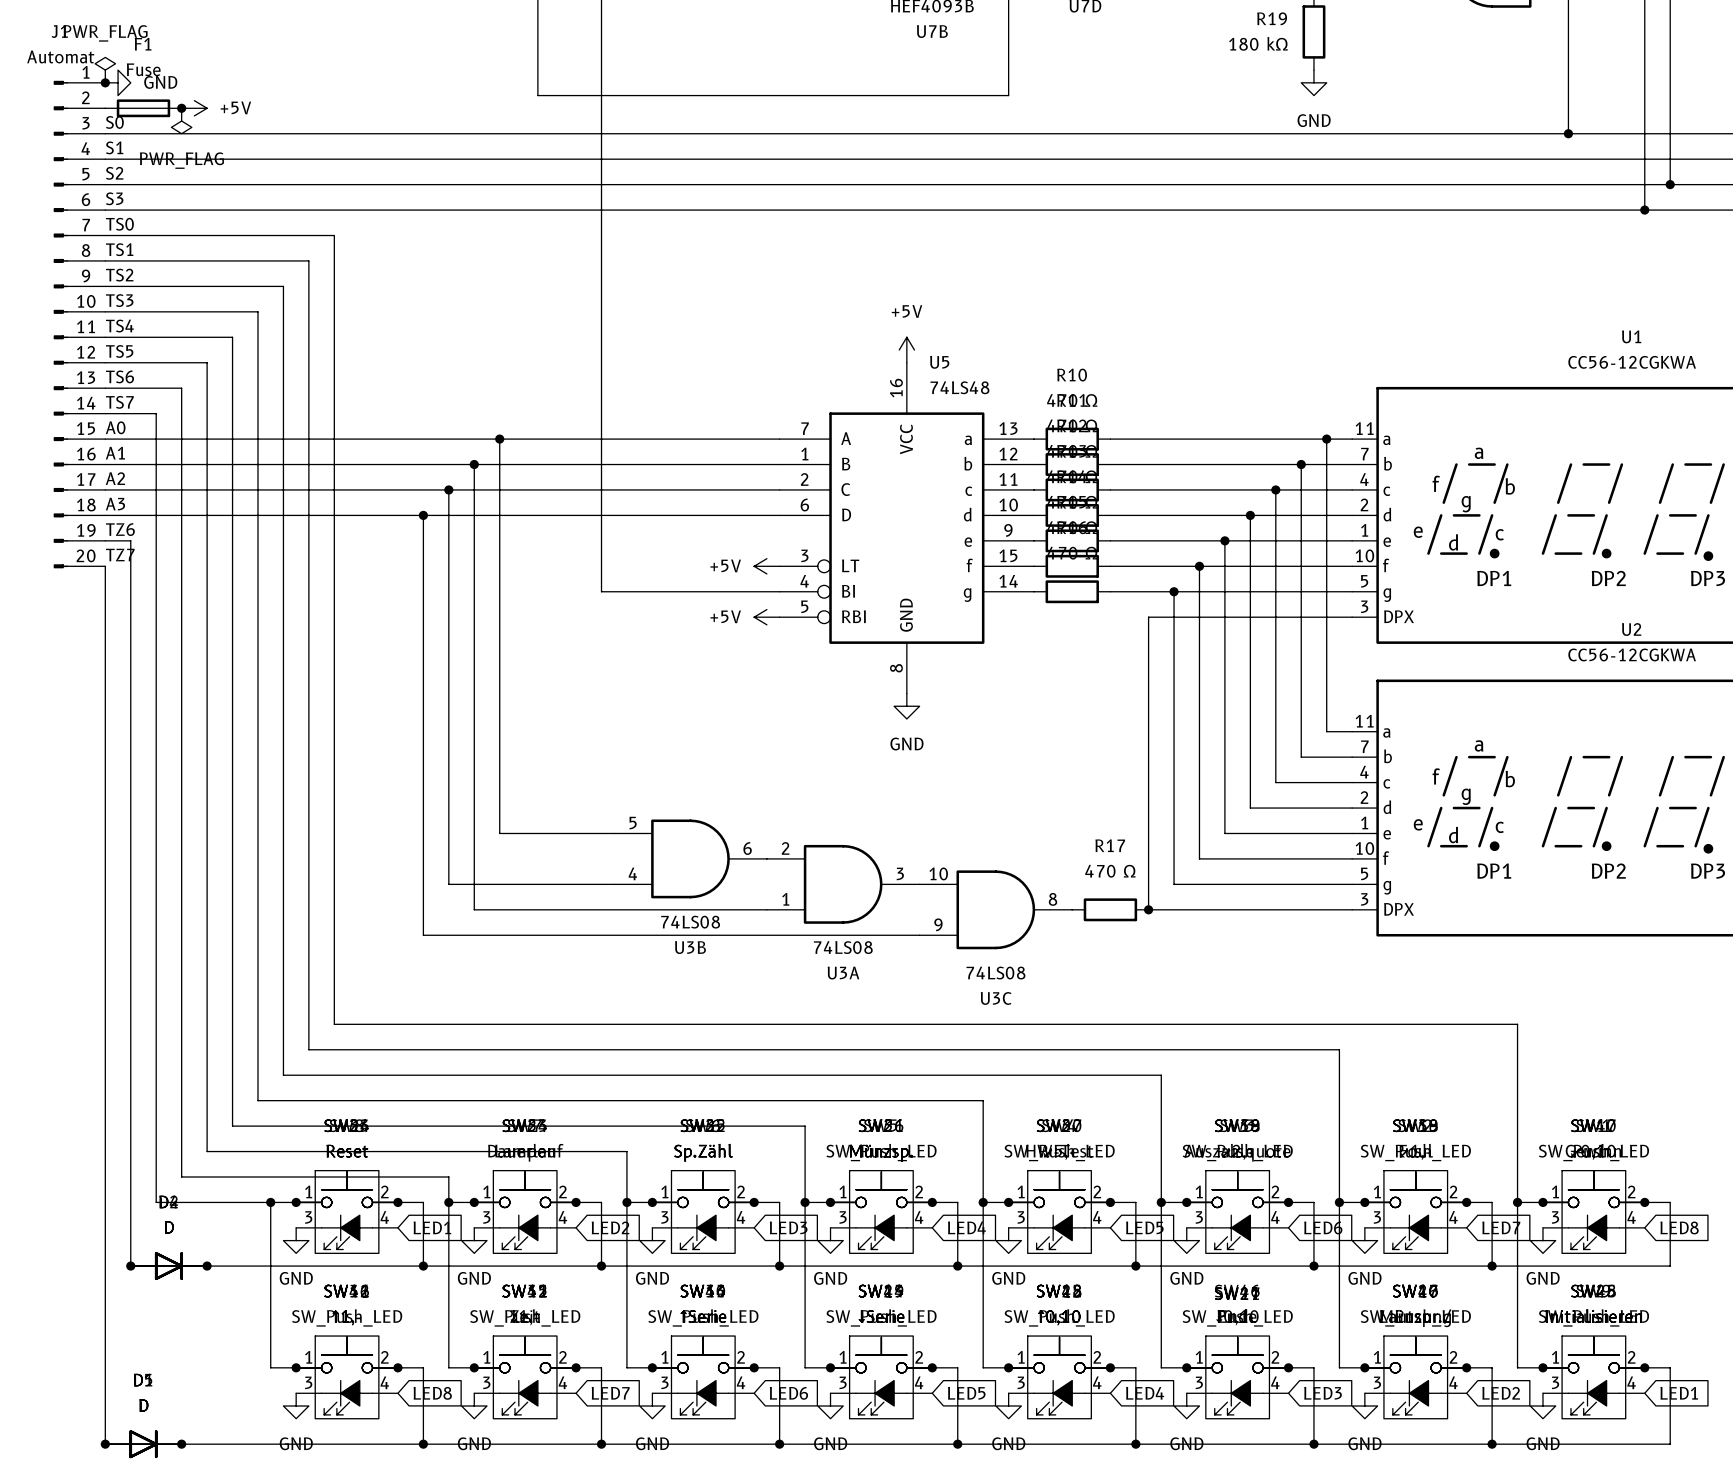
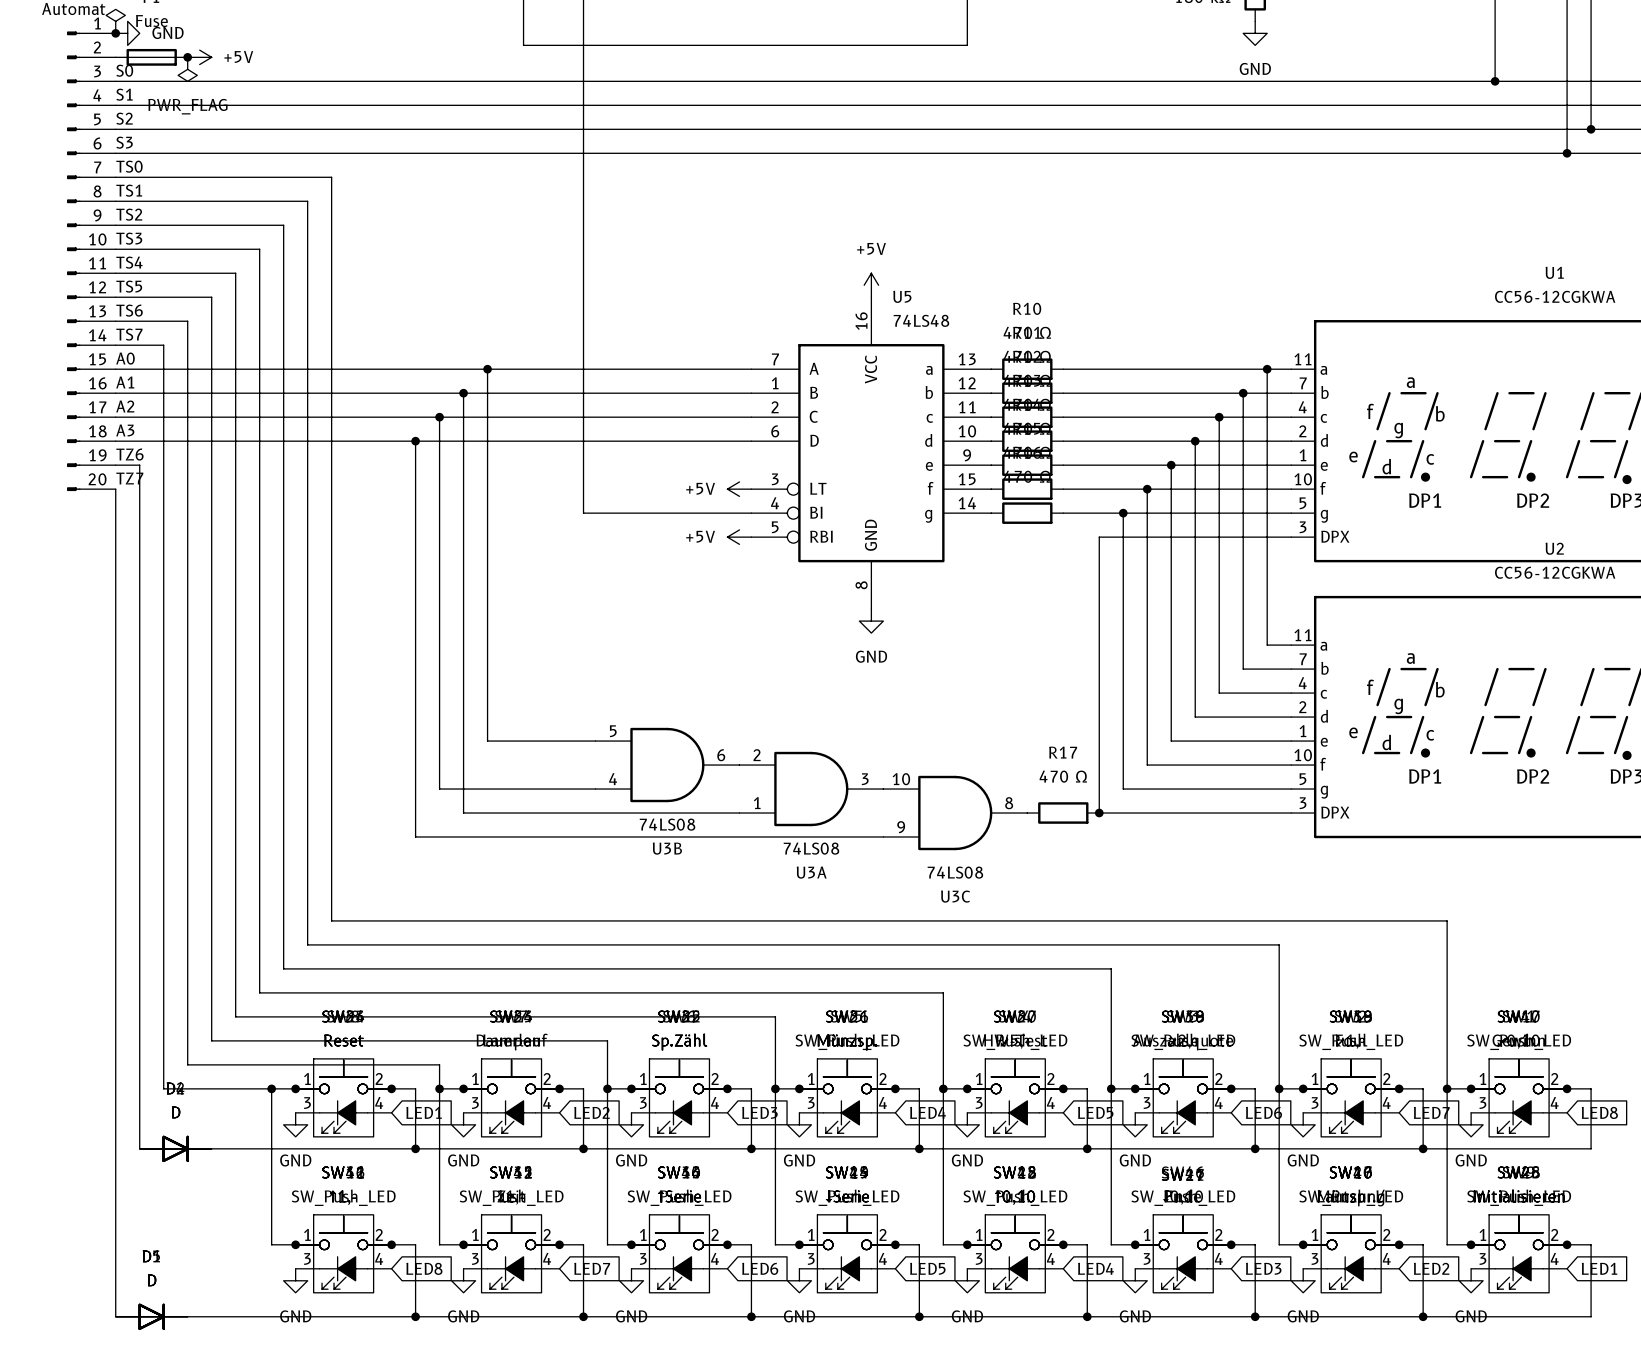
junction: (130, 1266) -> none
junction: (207, 1266) -> none
junction: (105, 1444) -> none
junction: (181, 1444) -> none

